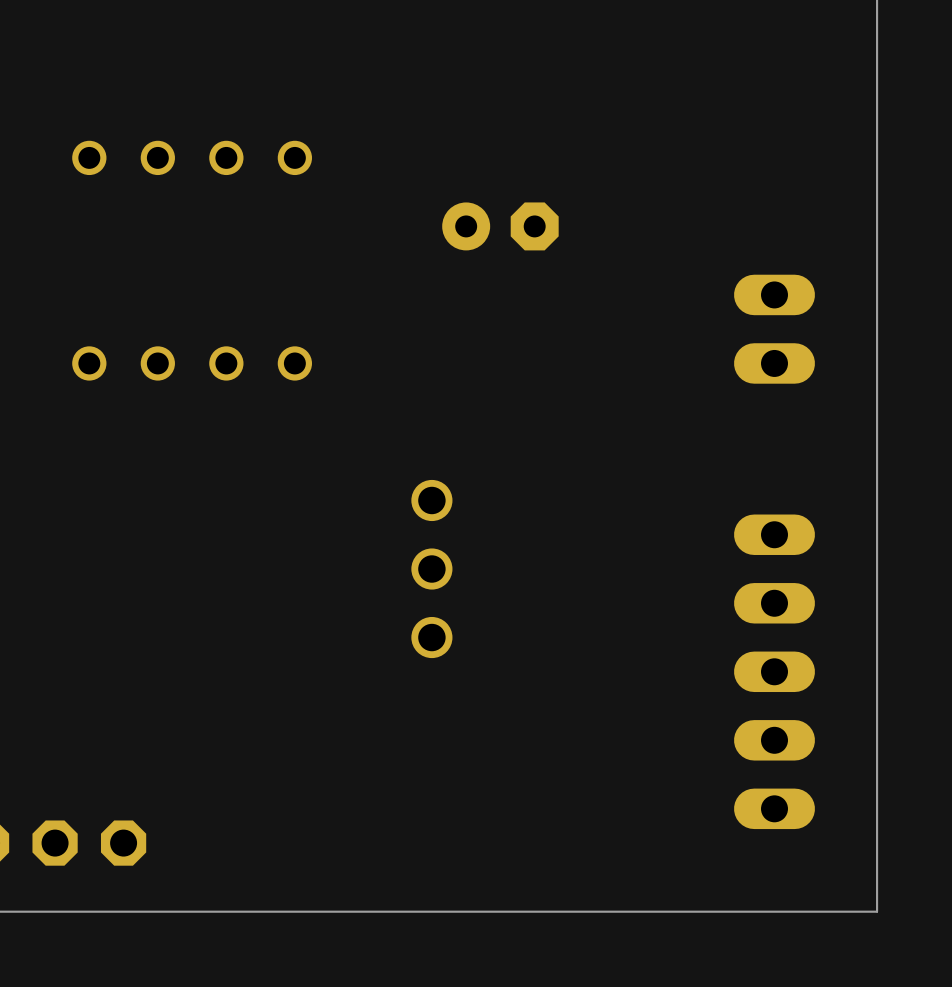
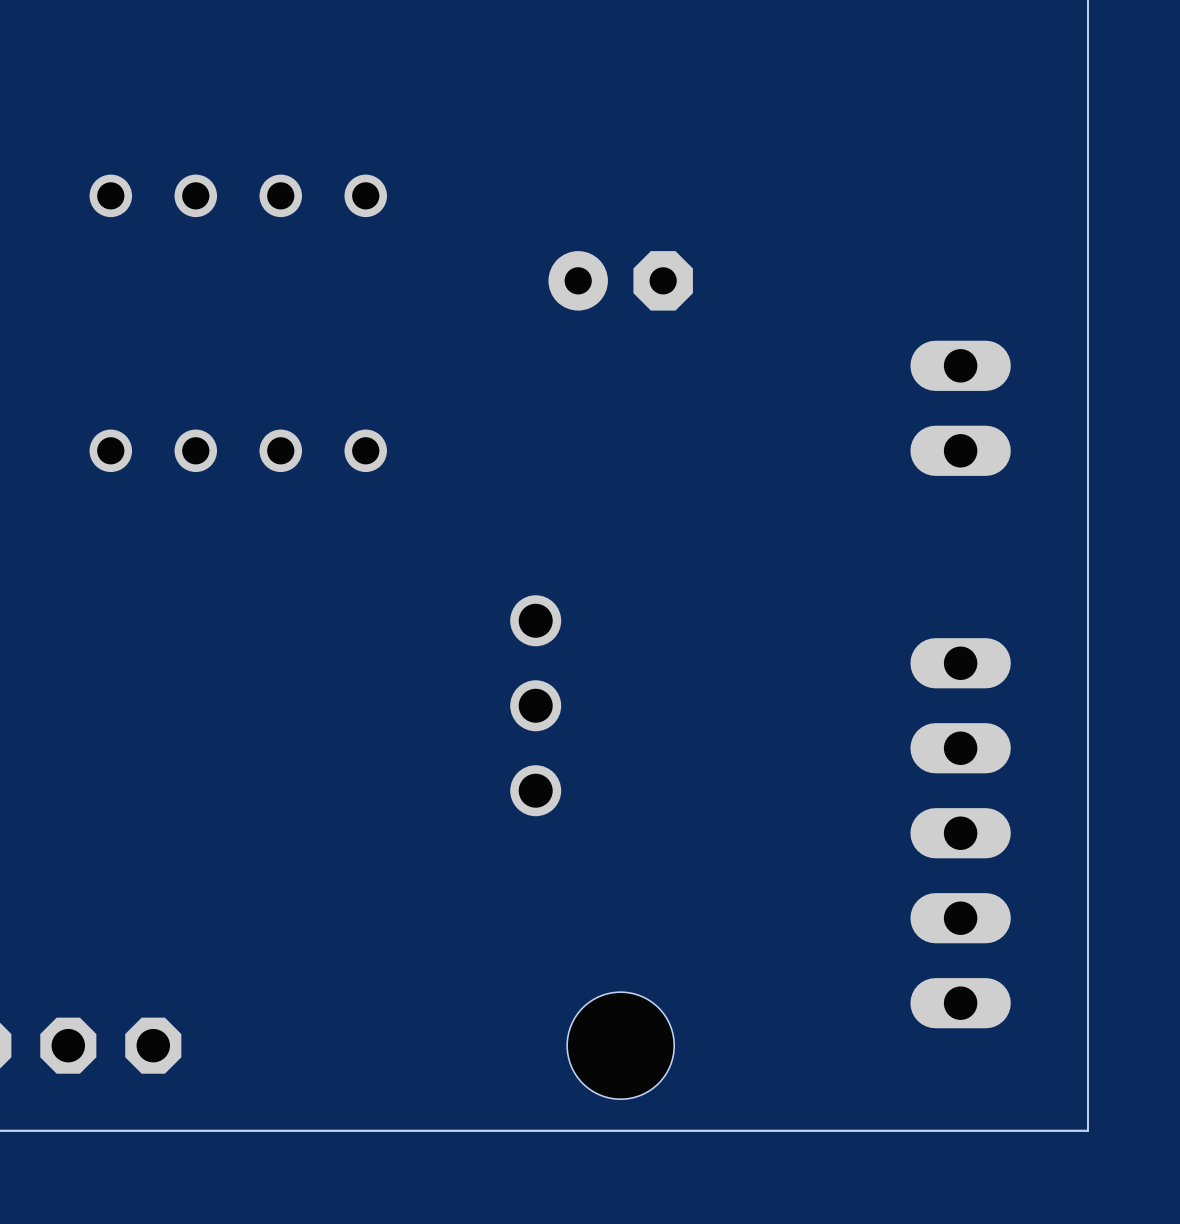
hole: none -> (620, 1045)

